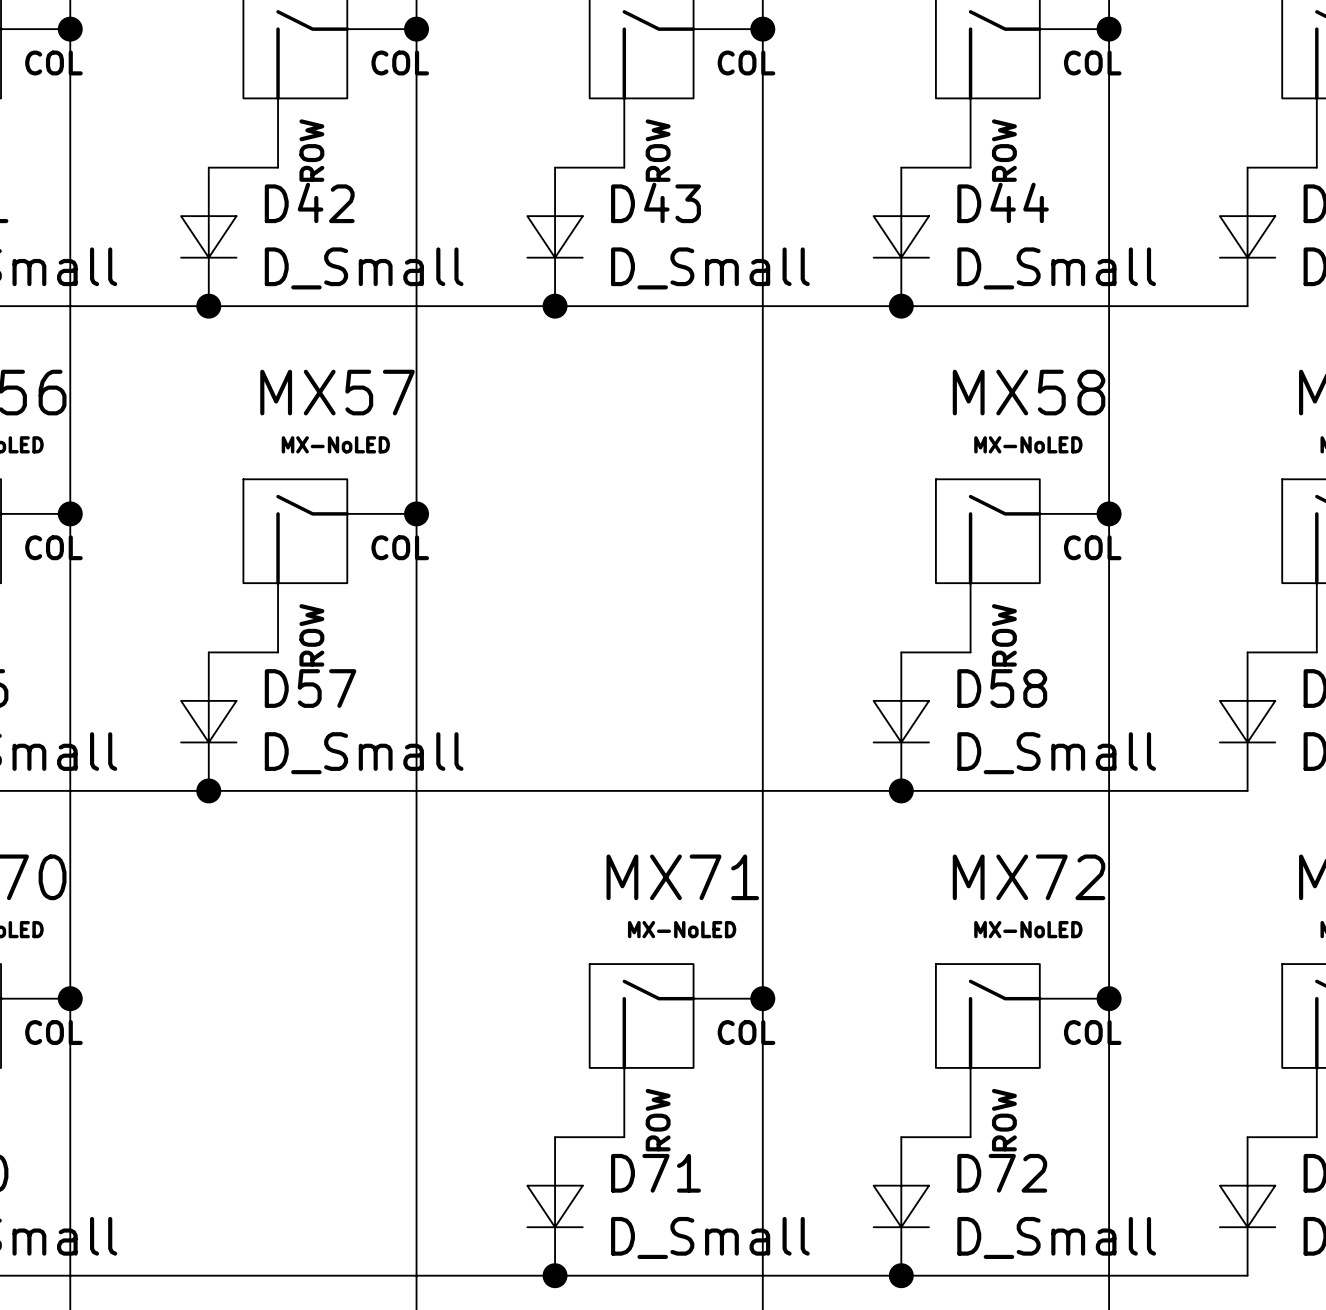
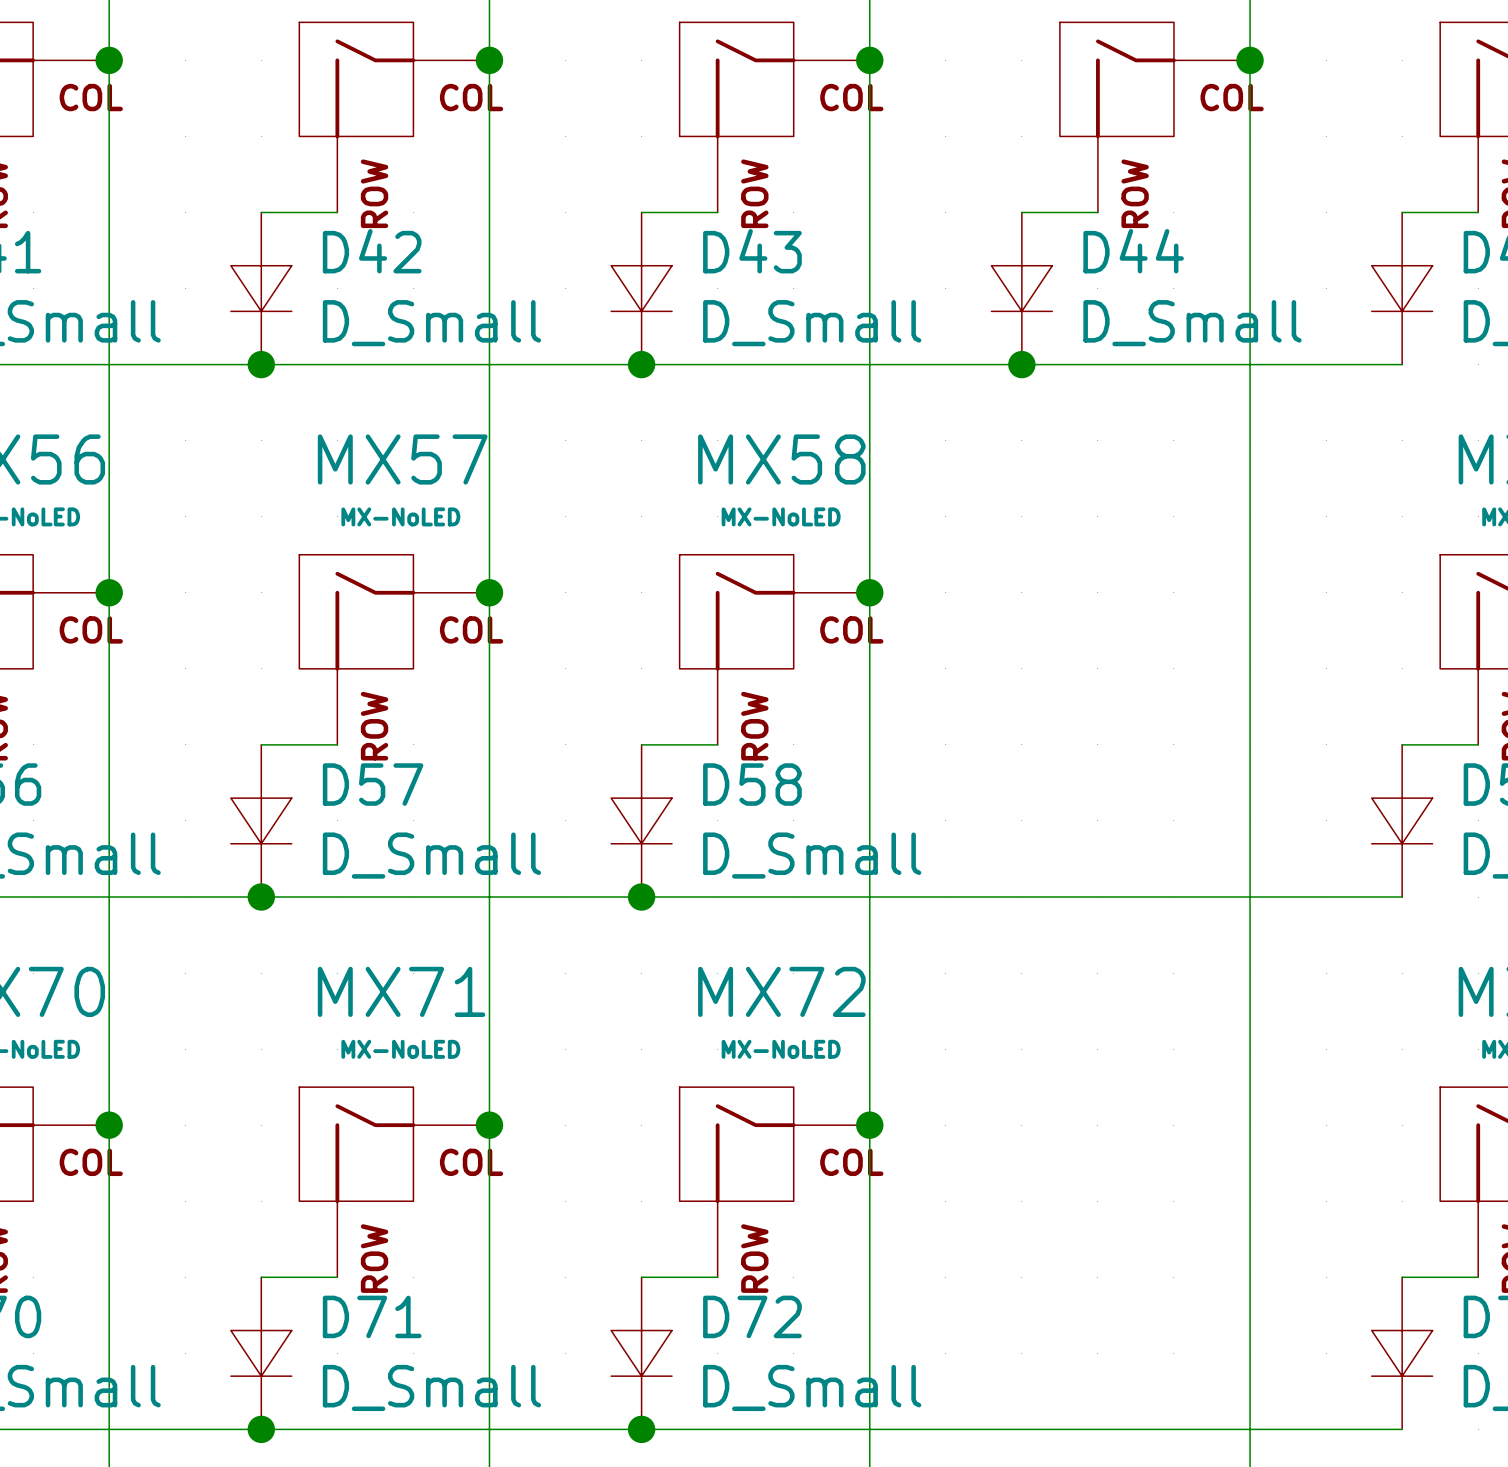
junction: none -> (869, 592)
junction: (1109, 513) -> none
MX58 position: (1022, 565) -> (774, 649)
wire: (901, 652) (970, 652) -> (641, 744) (717, 744)
D58 position: (901, 721) -> (641, 820)
junction: none -> (641, 897)
junction: (901, 790) -> none
MX71 name: MX71 (682, 877) -> MX72 (781, 991)
junction: none -> (489, 1125)
junction: (1109, 998) -> none
MX71: none -> MX-NoLED (394, 1182)
MX72: MX-NoLED (1022, 1050) -> none
wire: none -> (261, 1277) (337, 1277)
wire: (901, 1137) (970, 1137) -> none
D71 name: D71 (655, 1173) -> D72 (752, 1316)
D71: none -> D_Small (261, 1353)
D72: D_Small (901, 1206) -> none
junction: none -> (261, 1429)
junction: (901, 1275) -> none

